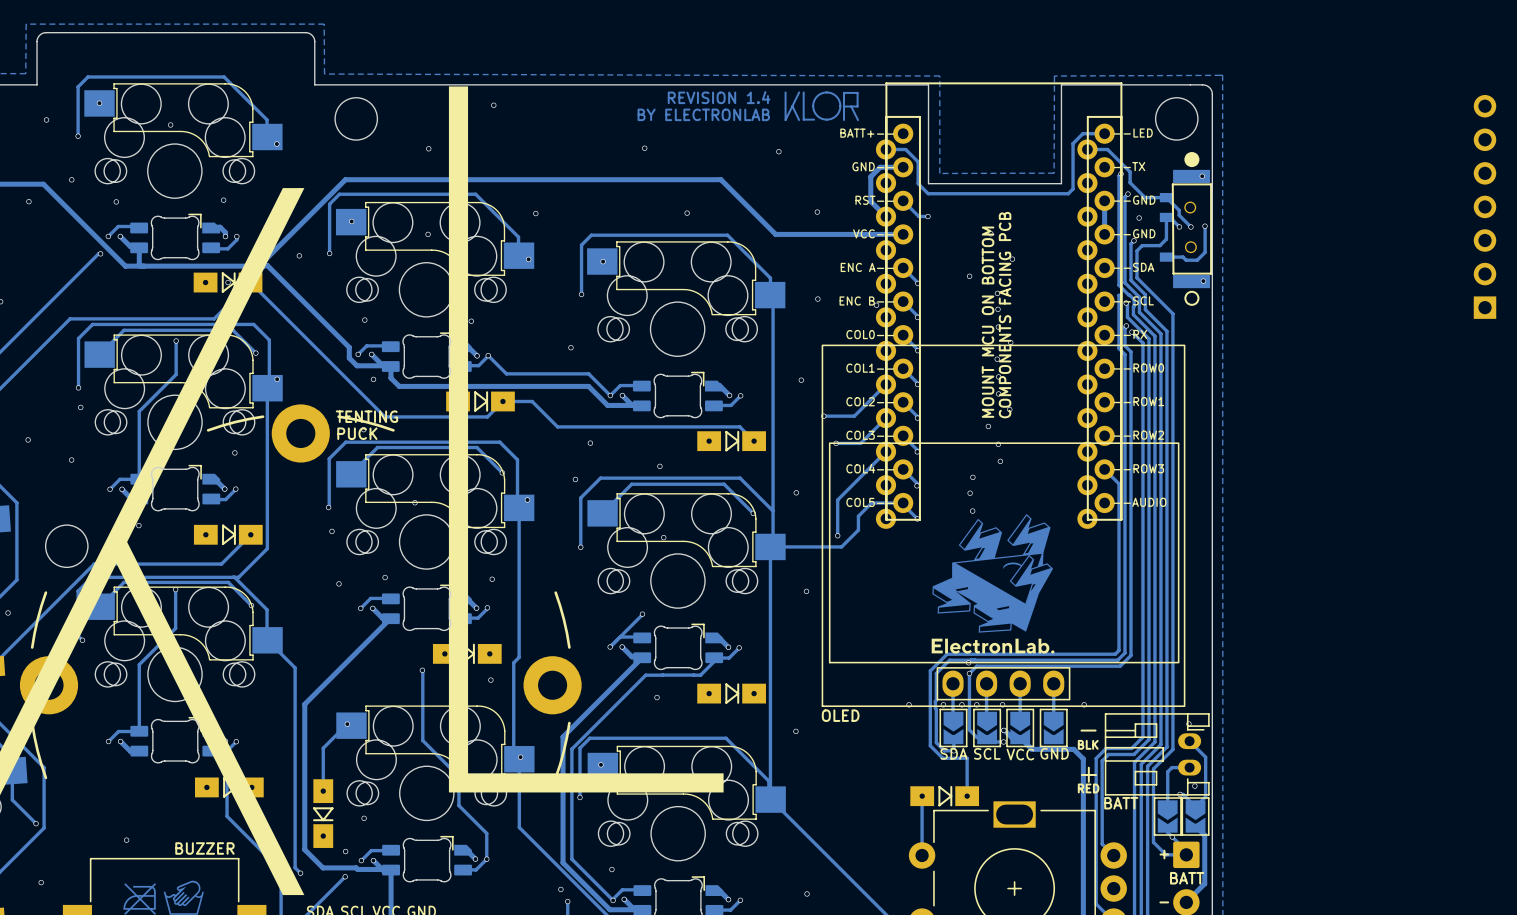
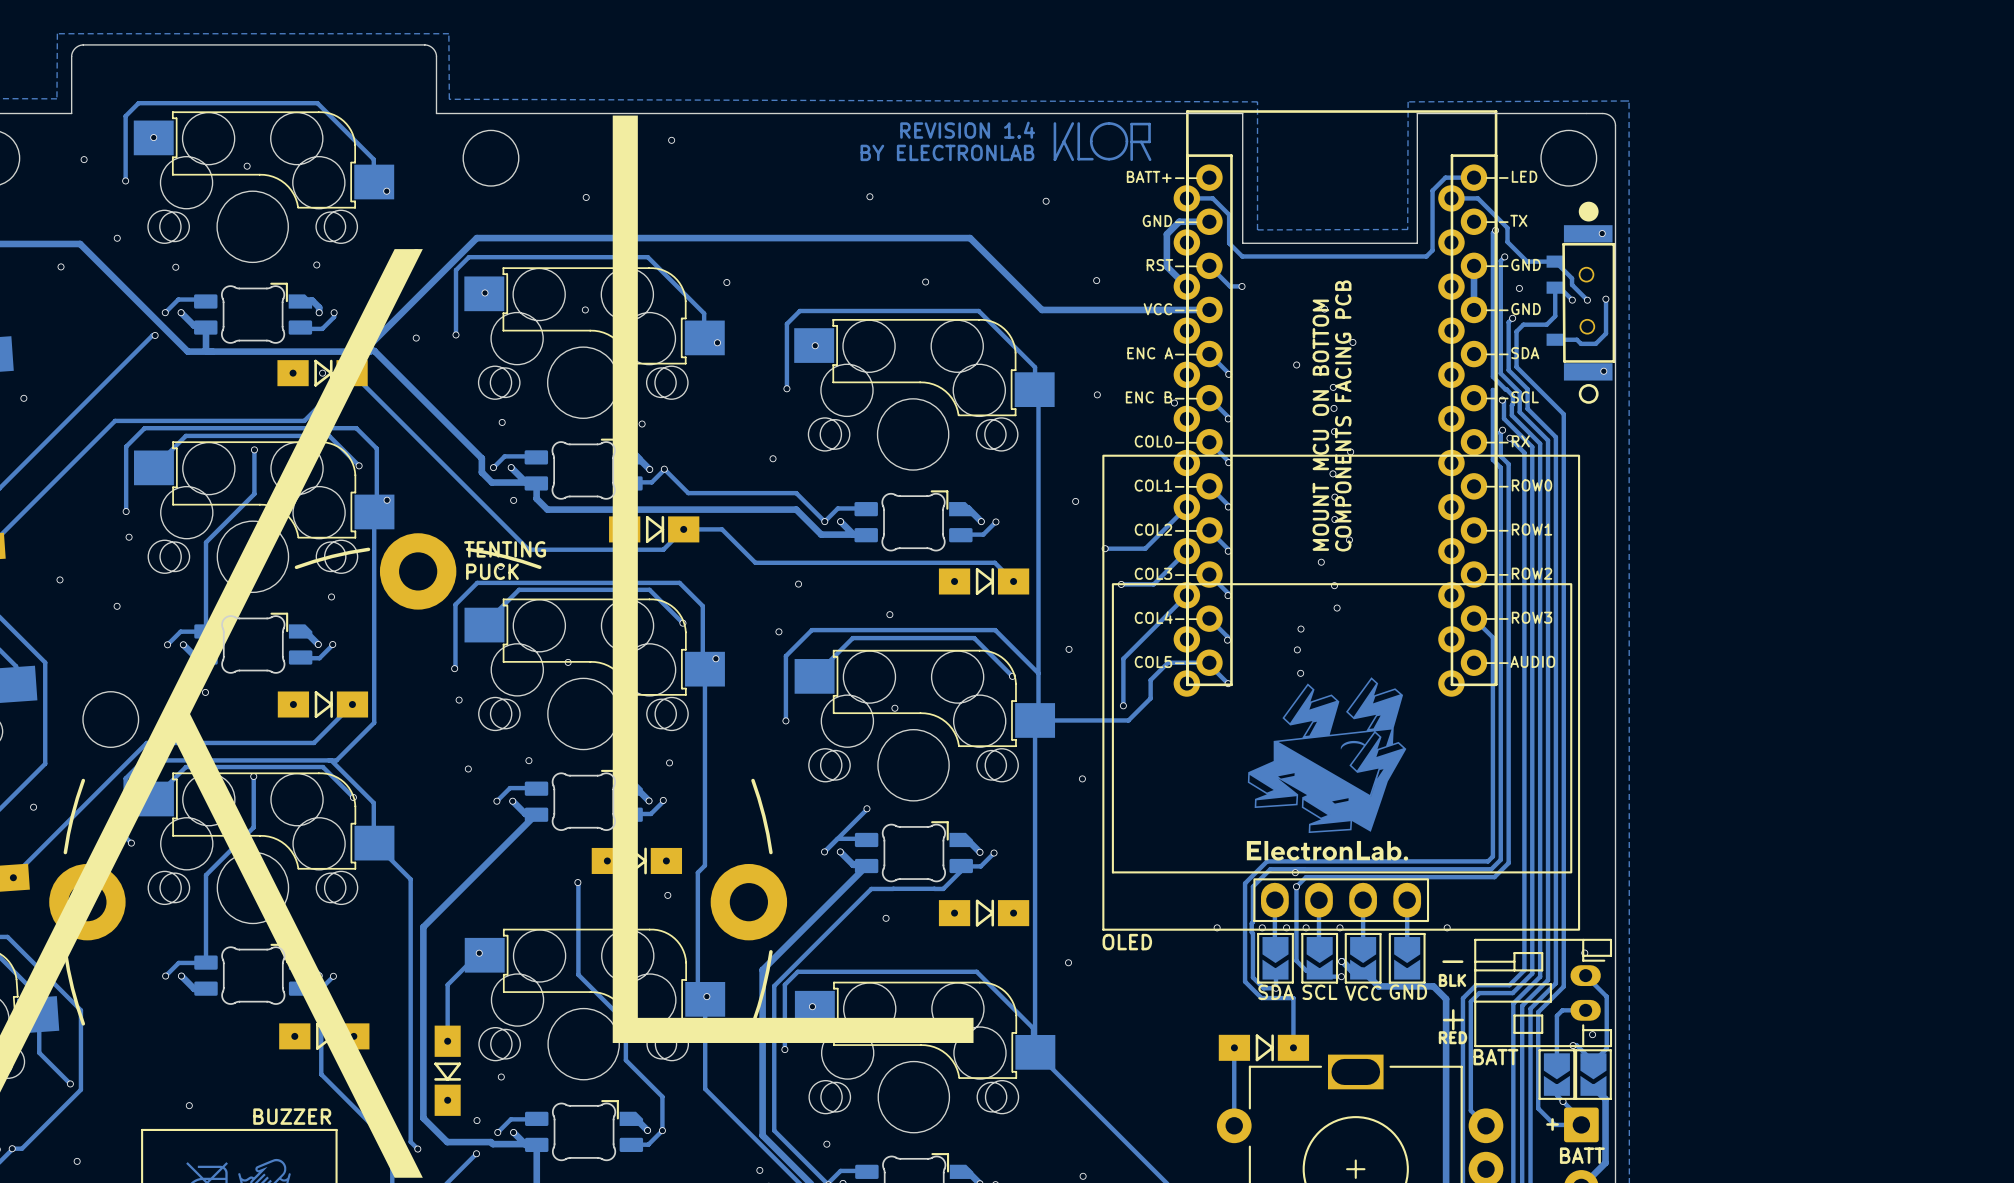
part: (1485, 206) -> none

